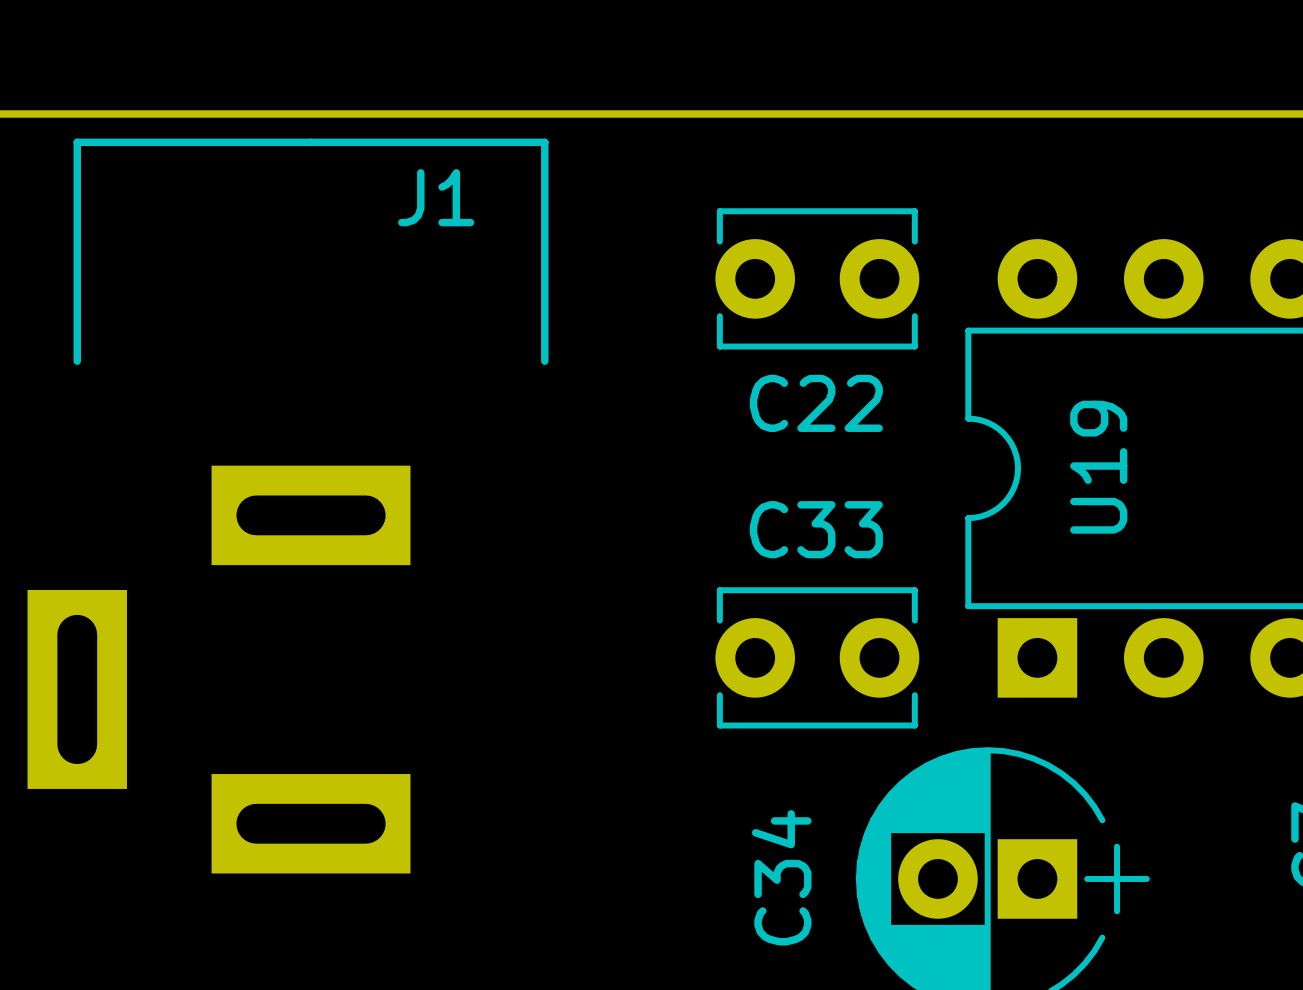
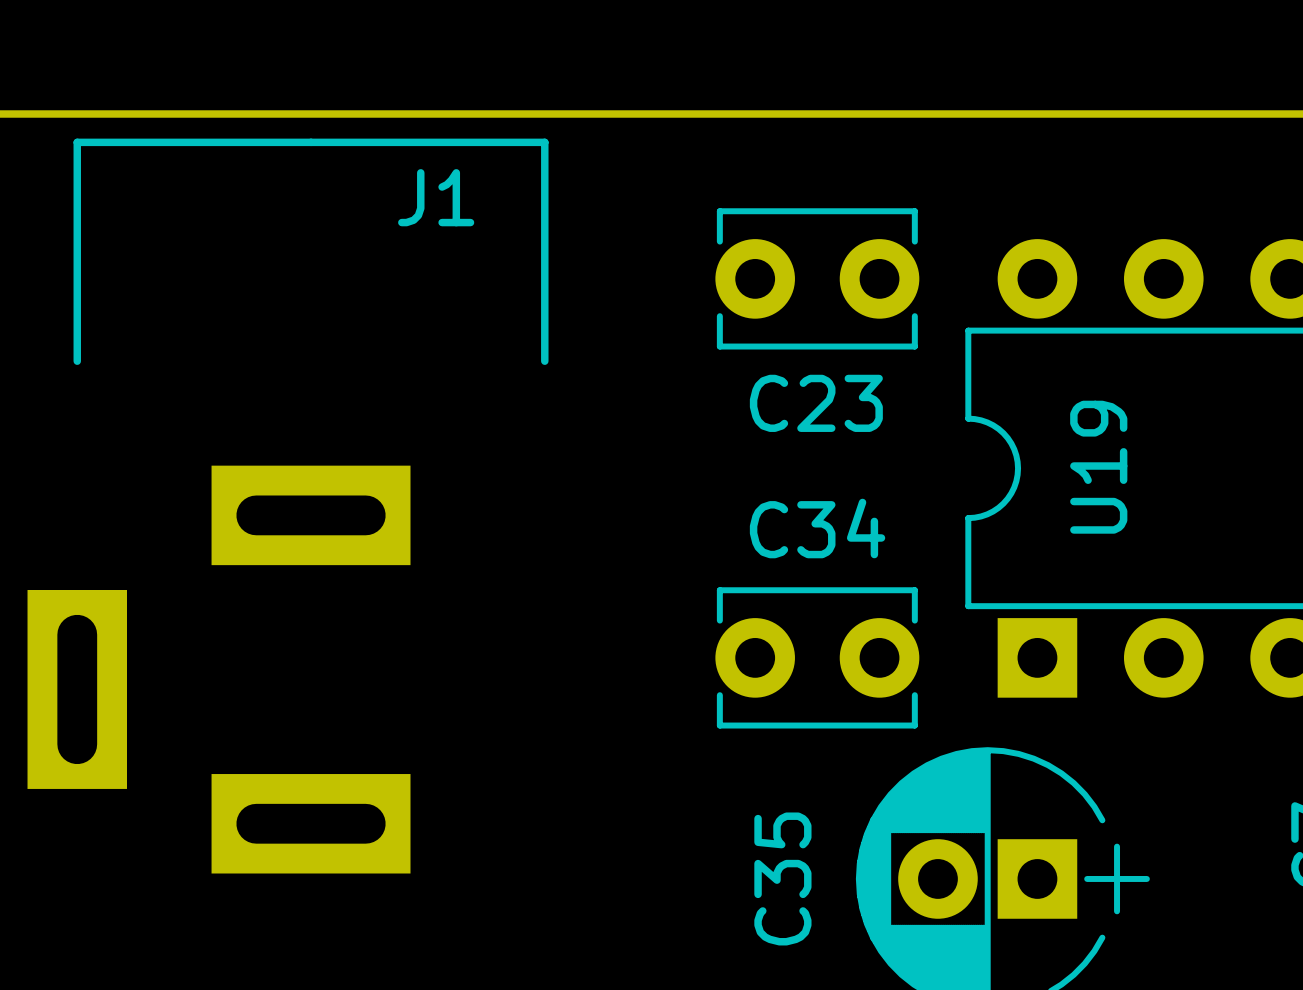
C22 name: C22 (816, 403) -> C23 (816, 403)
C33 name: C33 (816, 529) -> C34 (817, 528)
C34 name: C34 (781, 877) -> C35 (782, 878)

